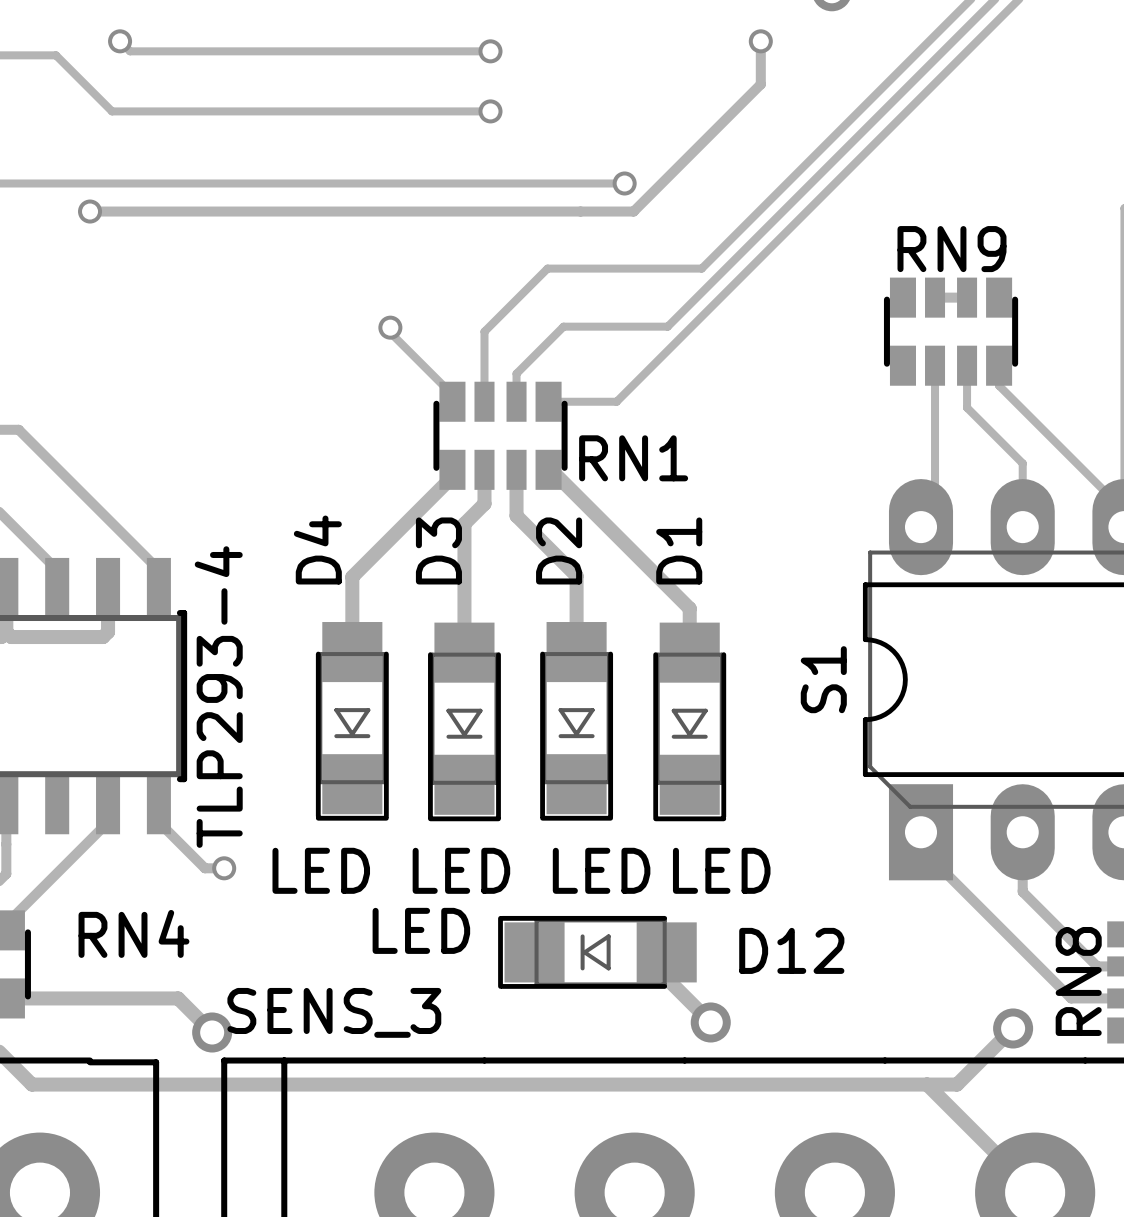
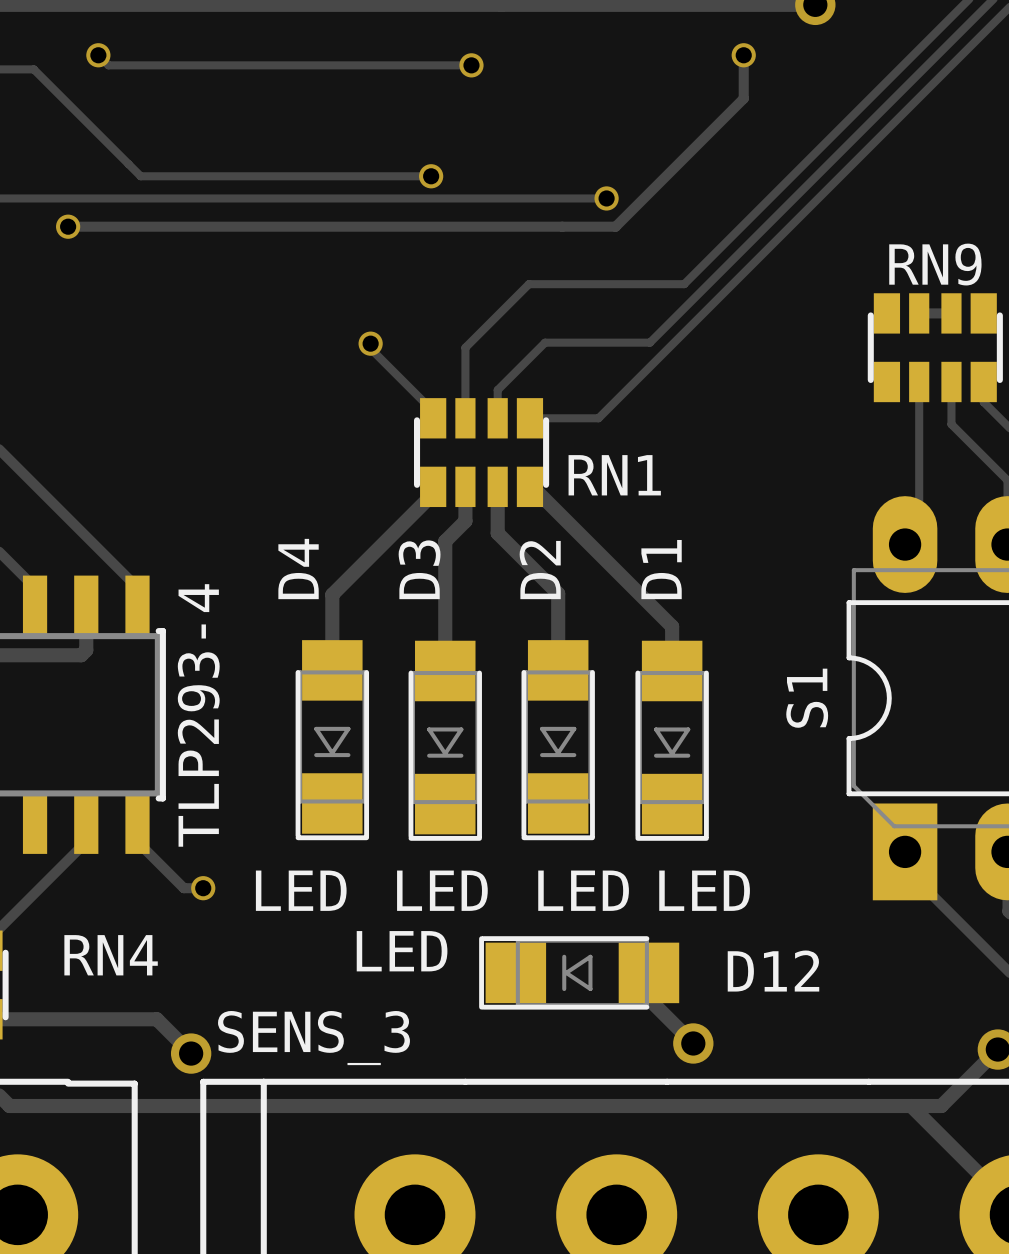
track: (112, 111) (490, 111) -> (90, 125) (140, 176) (431, 176)
via position: (490, 111) -> (431, 176)

